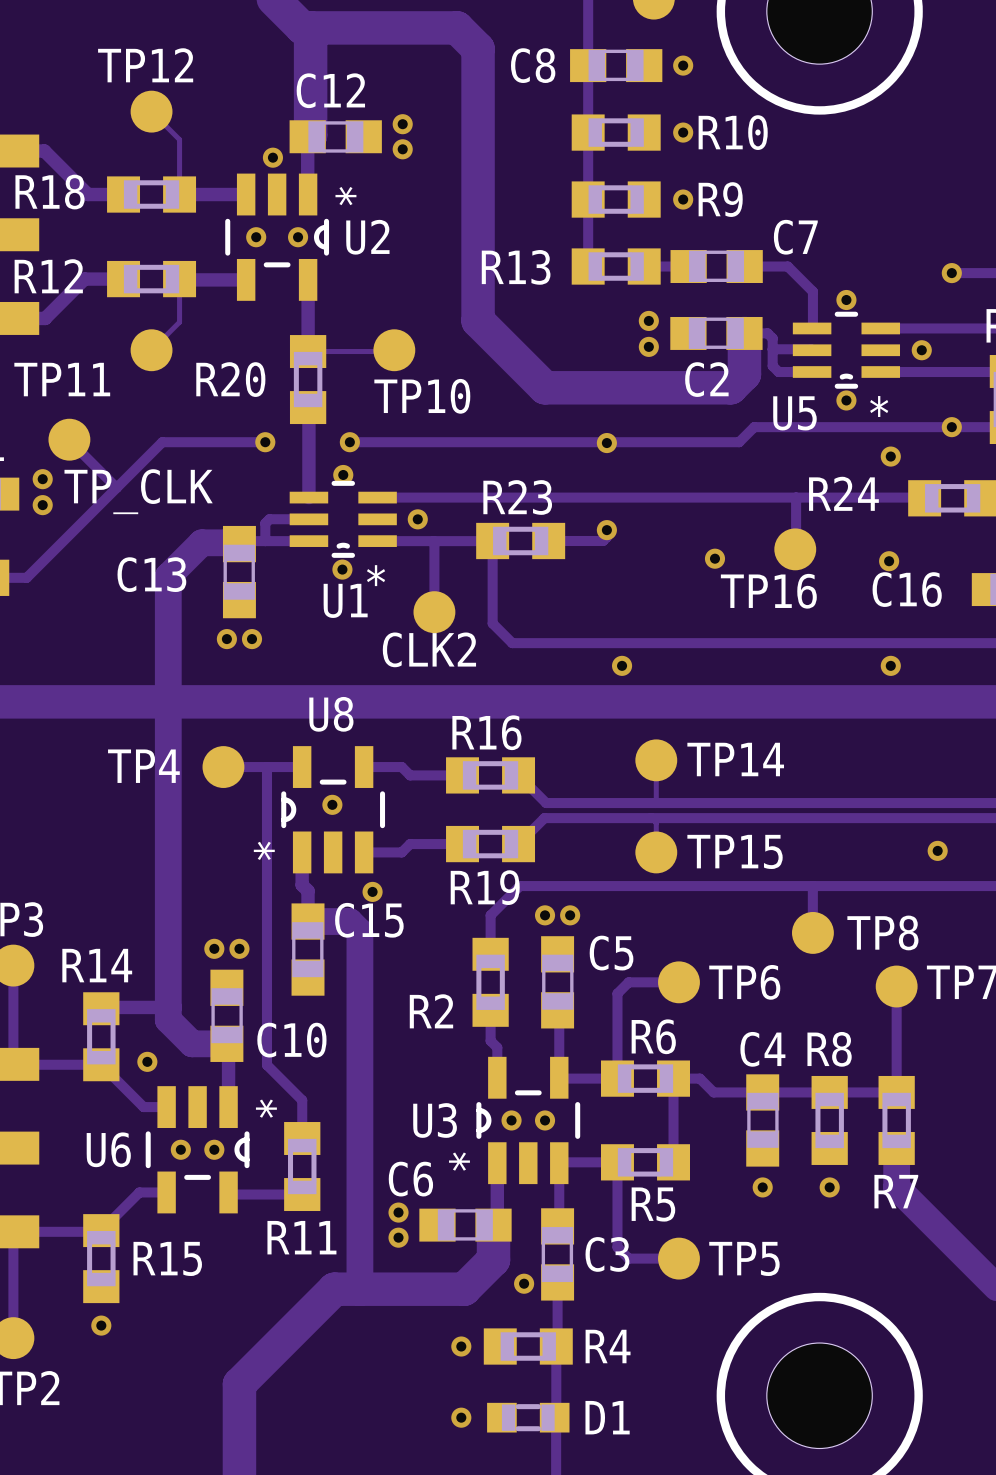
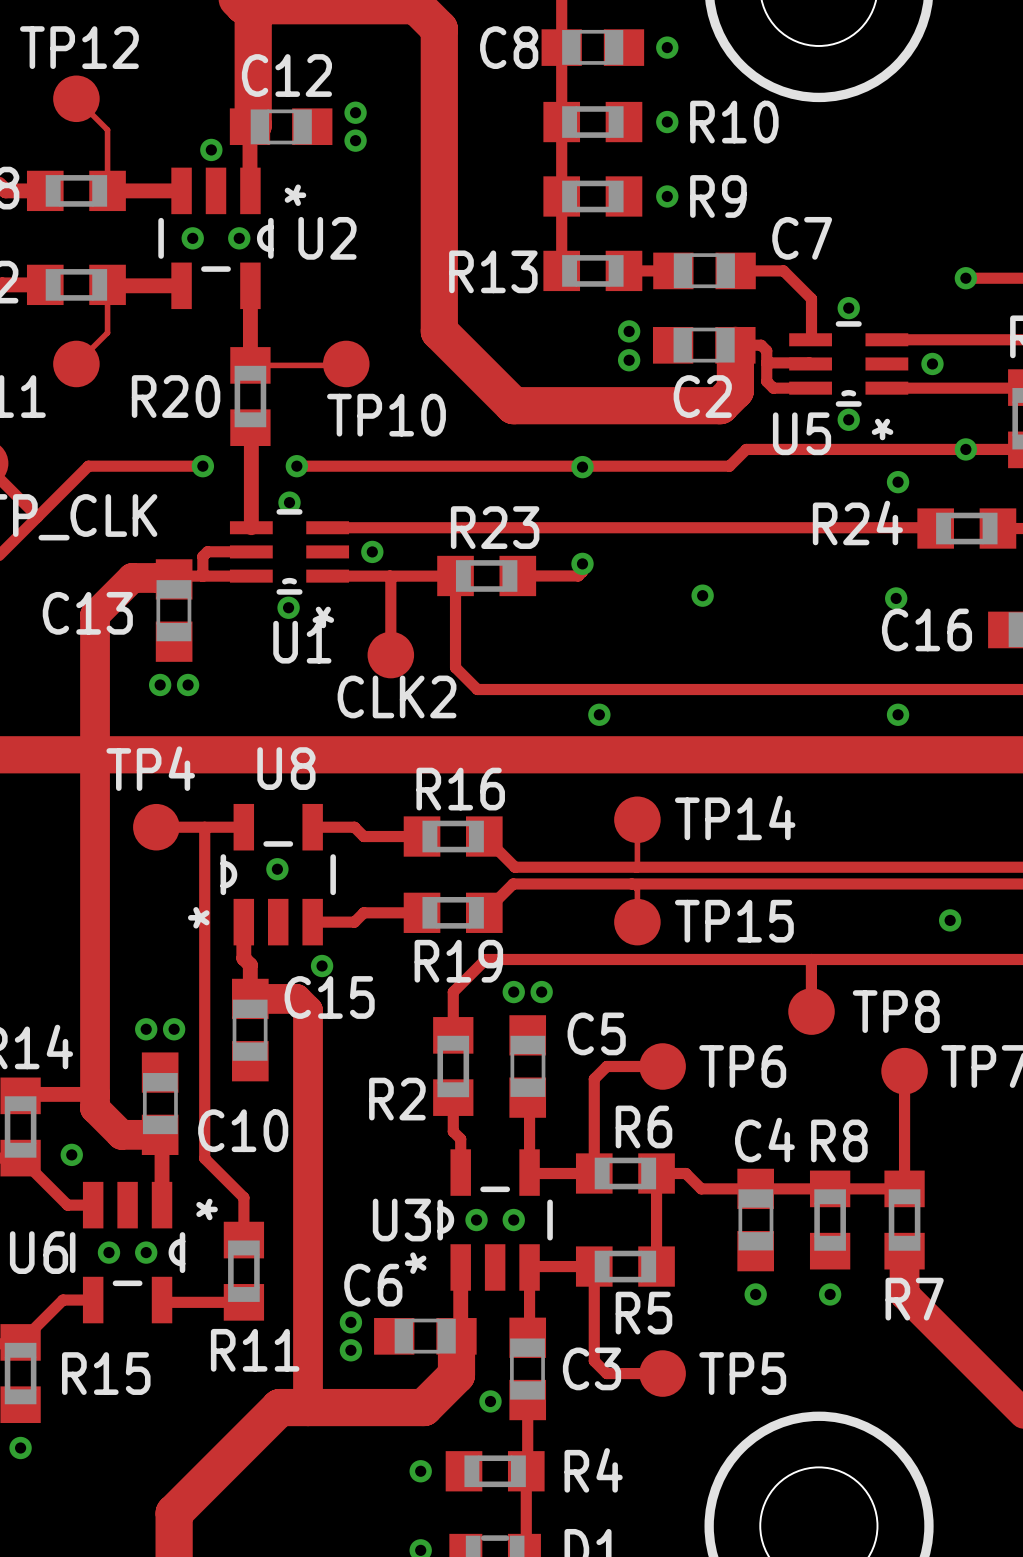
track: (796, 497) (795, 549) -> none
TP16: (795, 549) -> none
TP4 name position: TP4 (143, 766) -> TP4 (150, 768)

